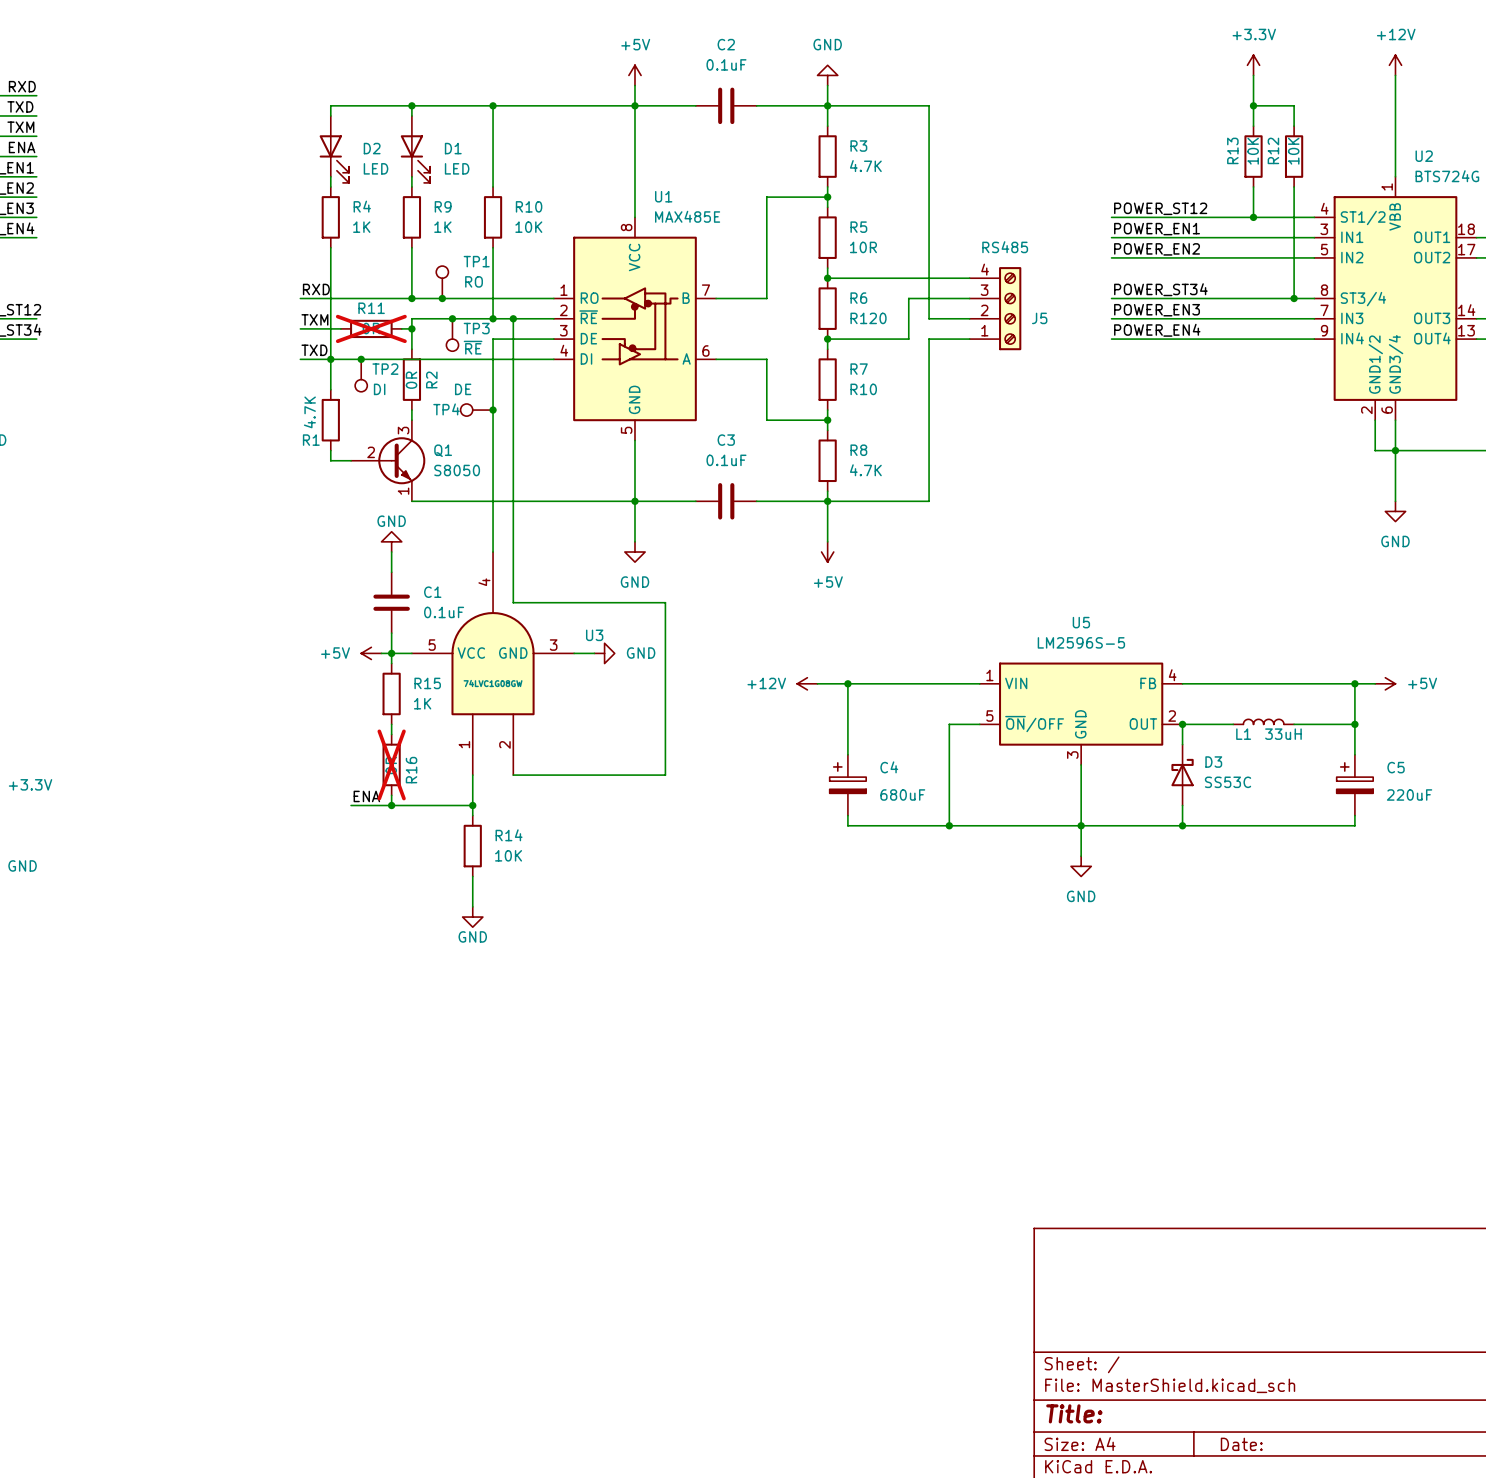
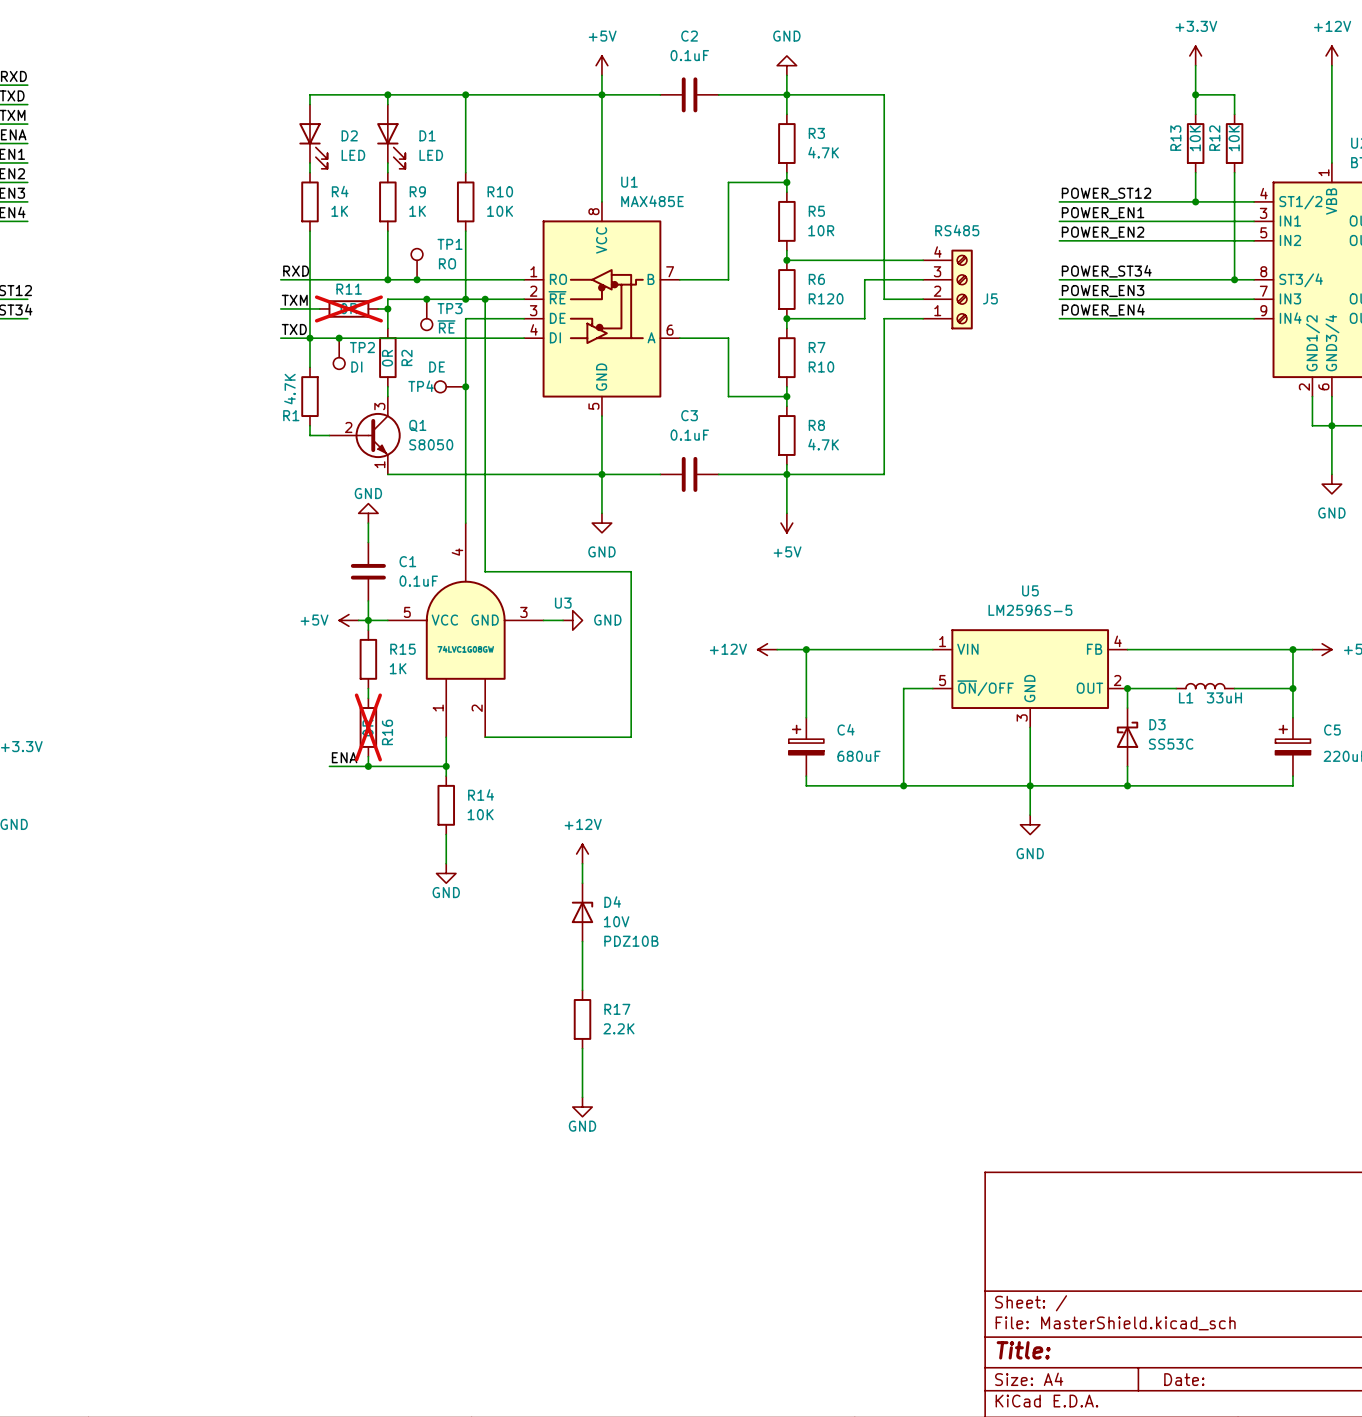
power symbol: none -> +12V (582, 854)
wire: none -> (582, 863) (582, 883)
D4: none -> 10V (582, 912)
wire: none -> (582, 941) (582, 990)
R17: none -> 2.2K (582, 1019)
wire: none -> (582, 1048) (582, 1097)
power symbol: none -> GND (582, 1107)

